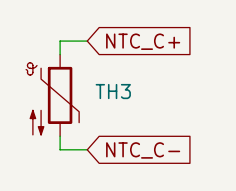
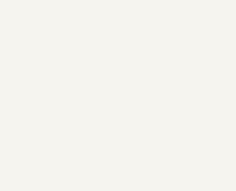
wire: (87, 41) (60, 41) (60, 54) -> none
global label: NTC_C+ (143, 41) -> none
TH3: (52, 95) -> none
wire: (60, 136) (60, 149) (87, 149) -> none
global label: NTC_C- (143, 150) -> none

